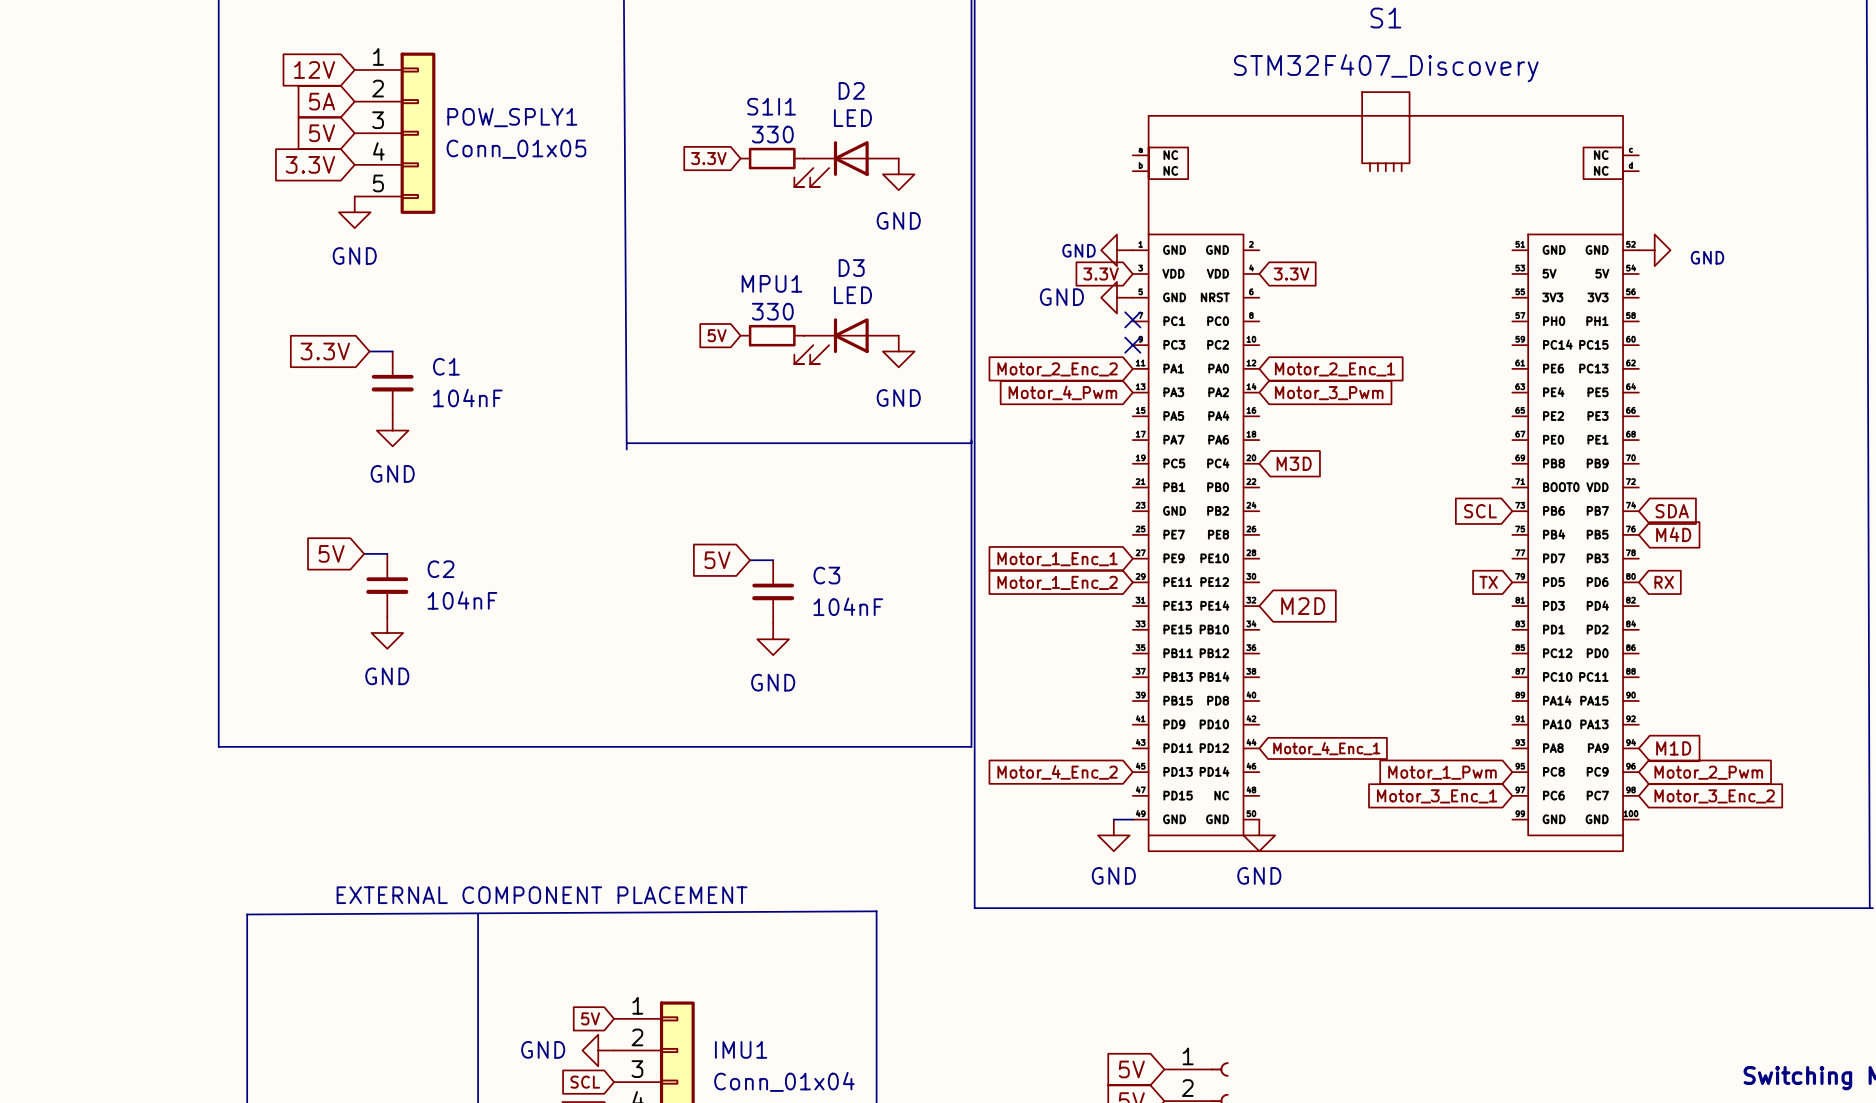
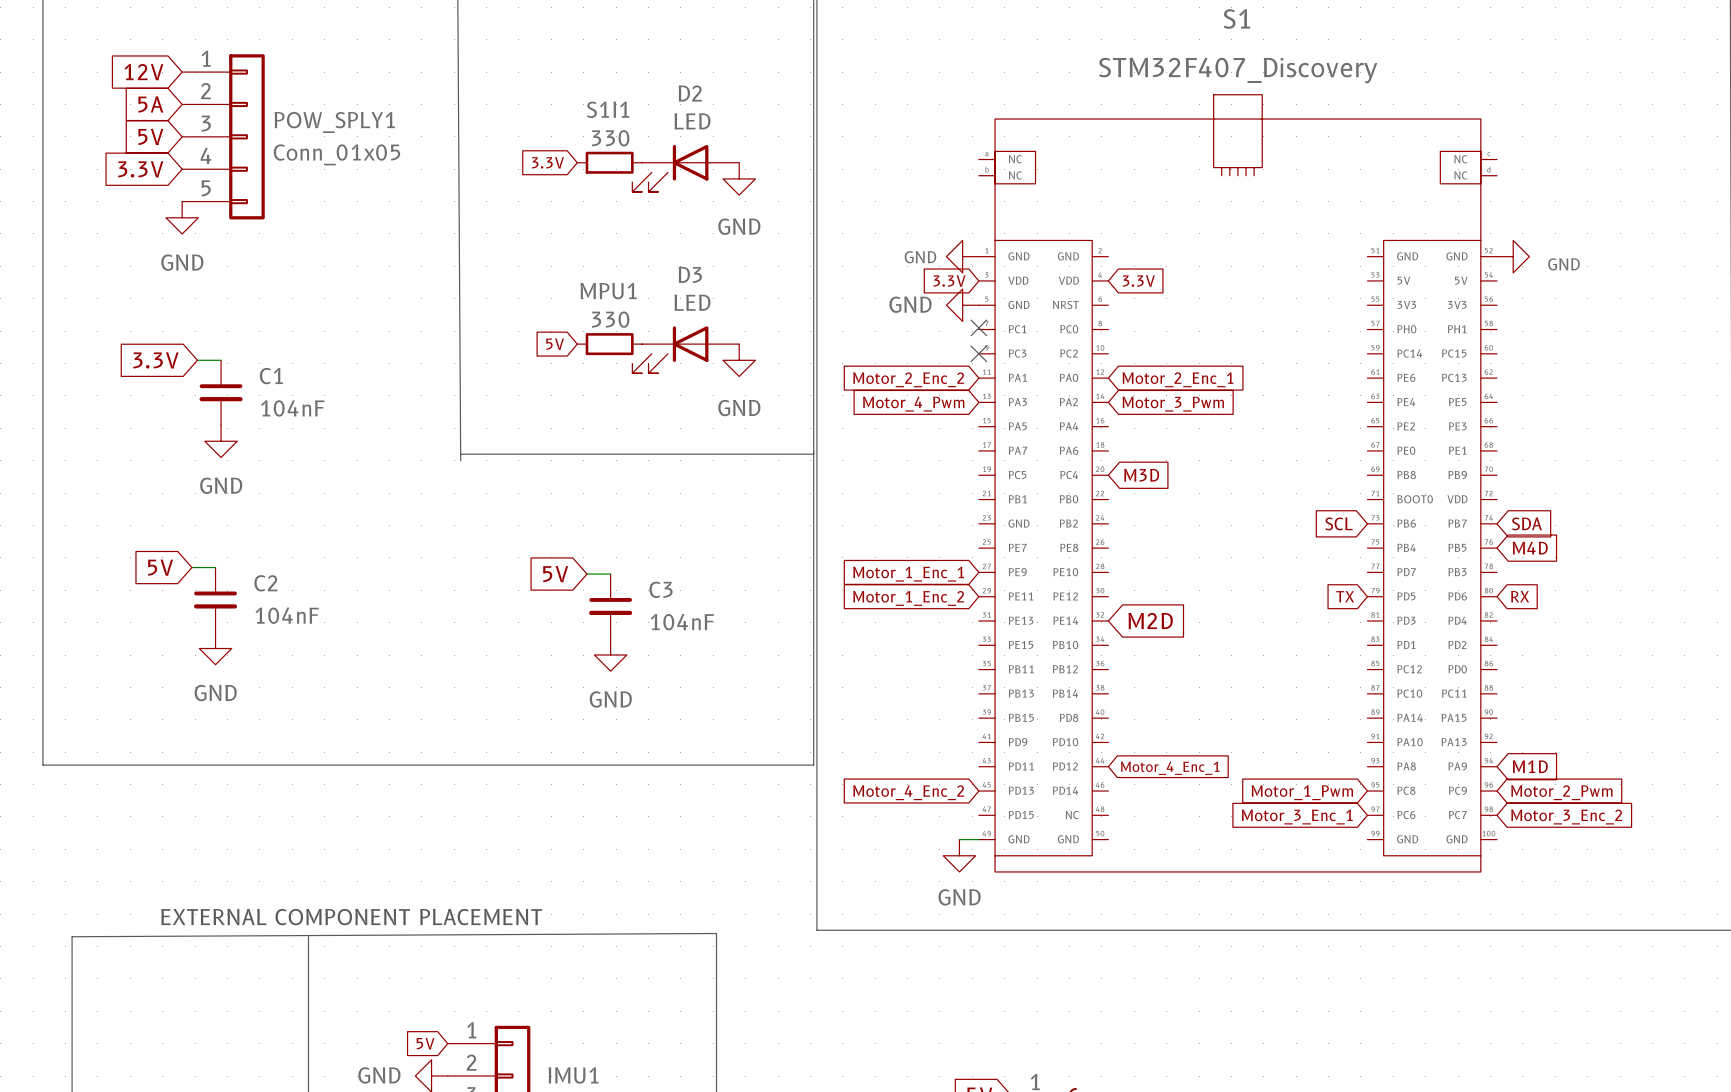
power symbol: GND (1259, 835) -> none

